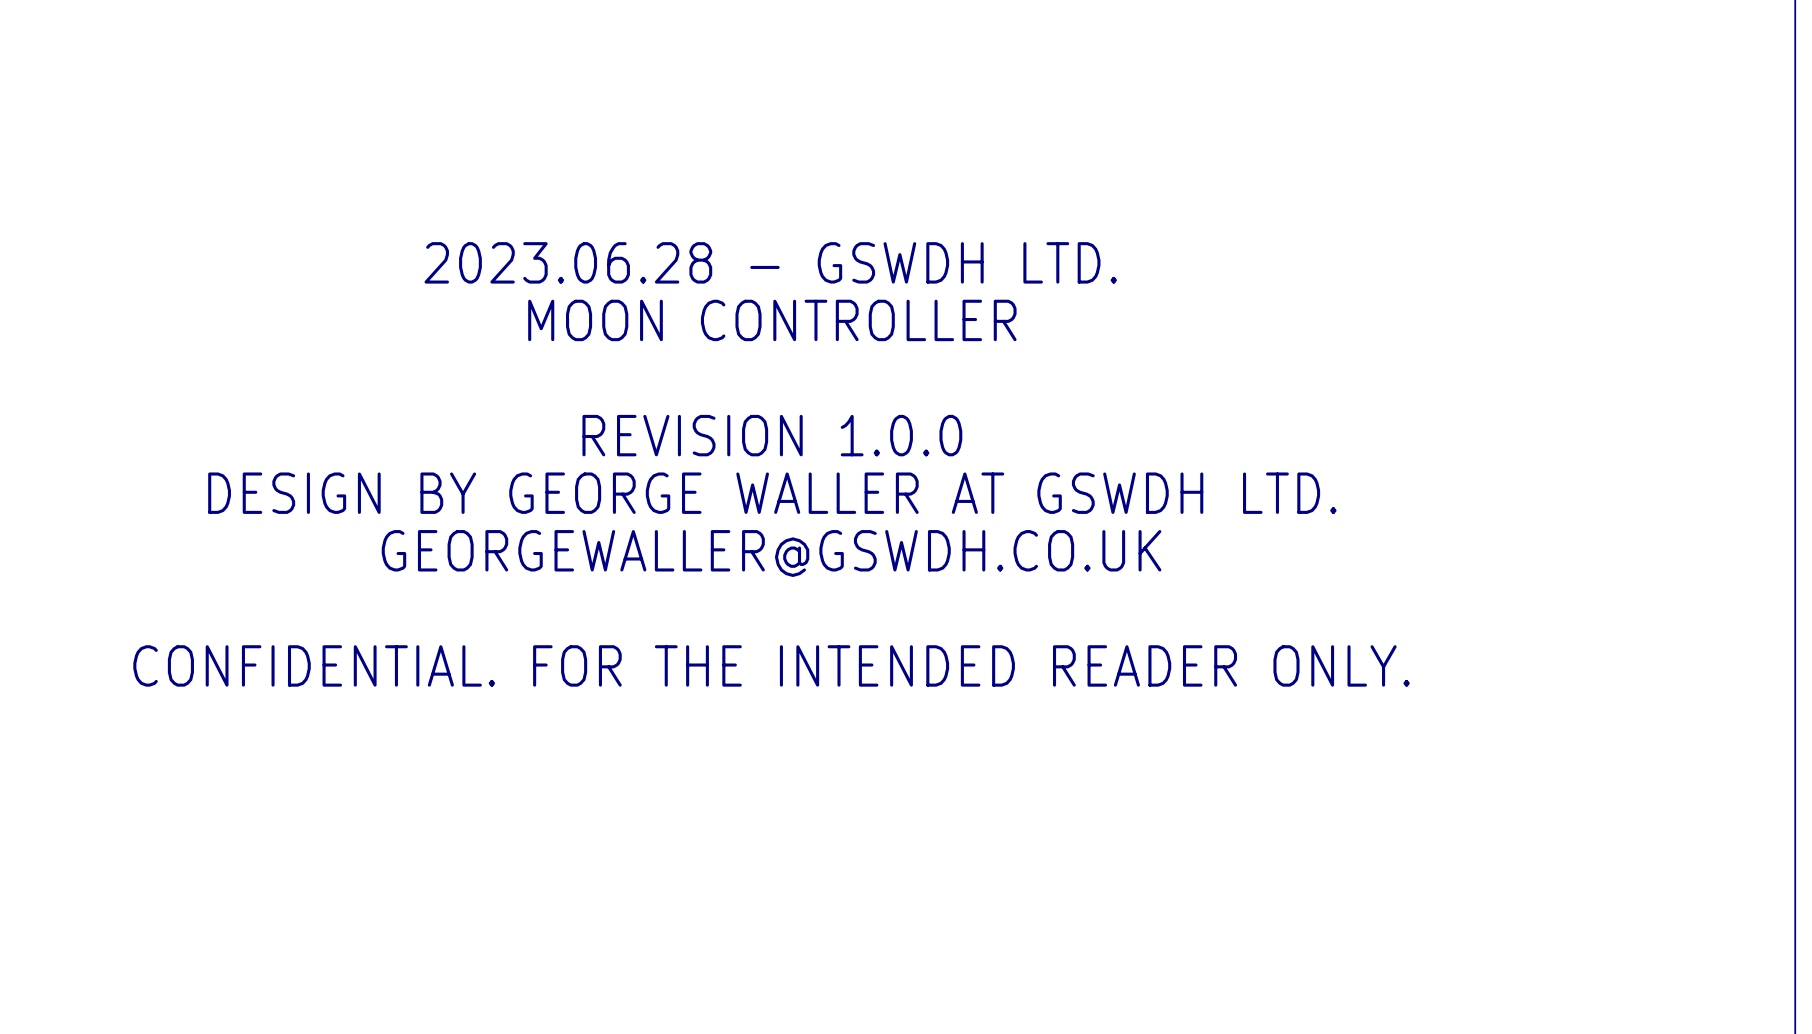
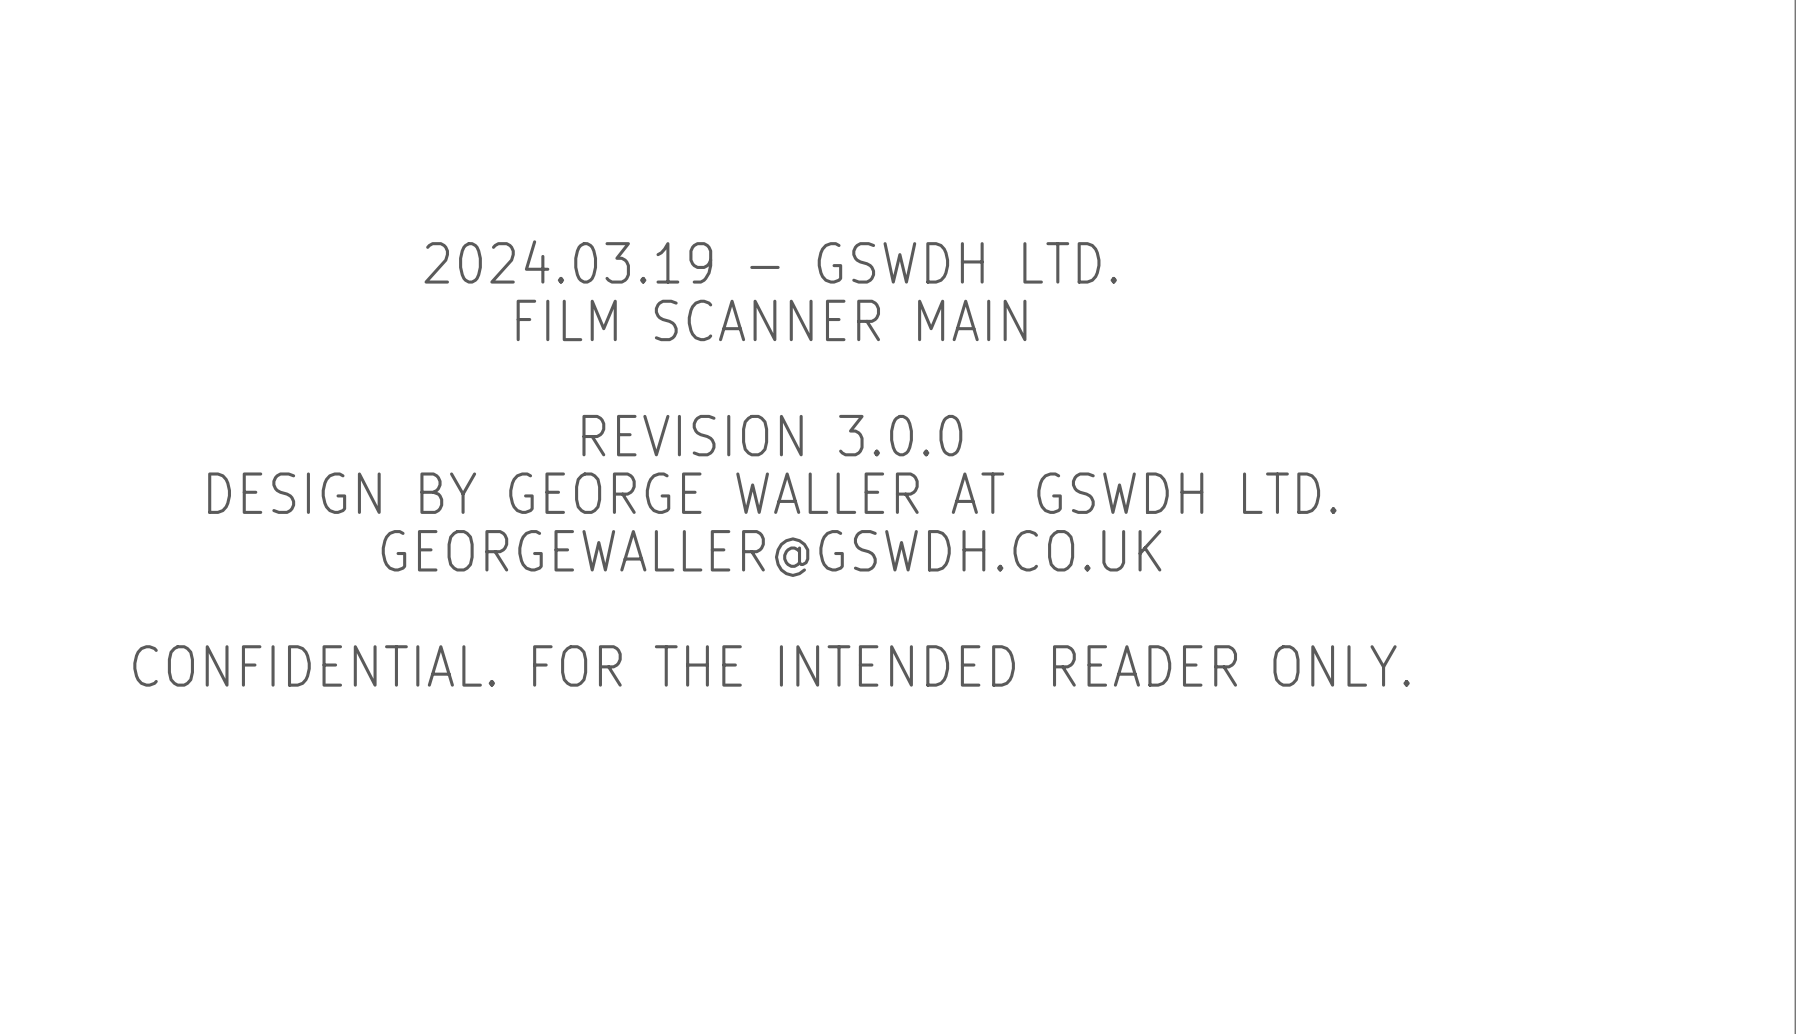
text: 2023.06.28 - GSWDH LTD. (770, 262) -> 2024.03.19 - GSWDH LTD. (770, 261)
text: MOON CONTROLLER (772, 320) -> FILM SCANNER MAIN (771, 320)
text: REVISION 1.0.0 (772, 435) -> REVISION 3.0.0 (772, 435)

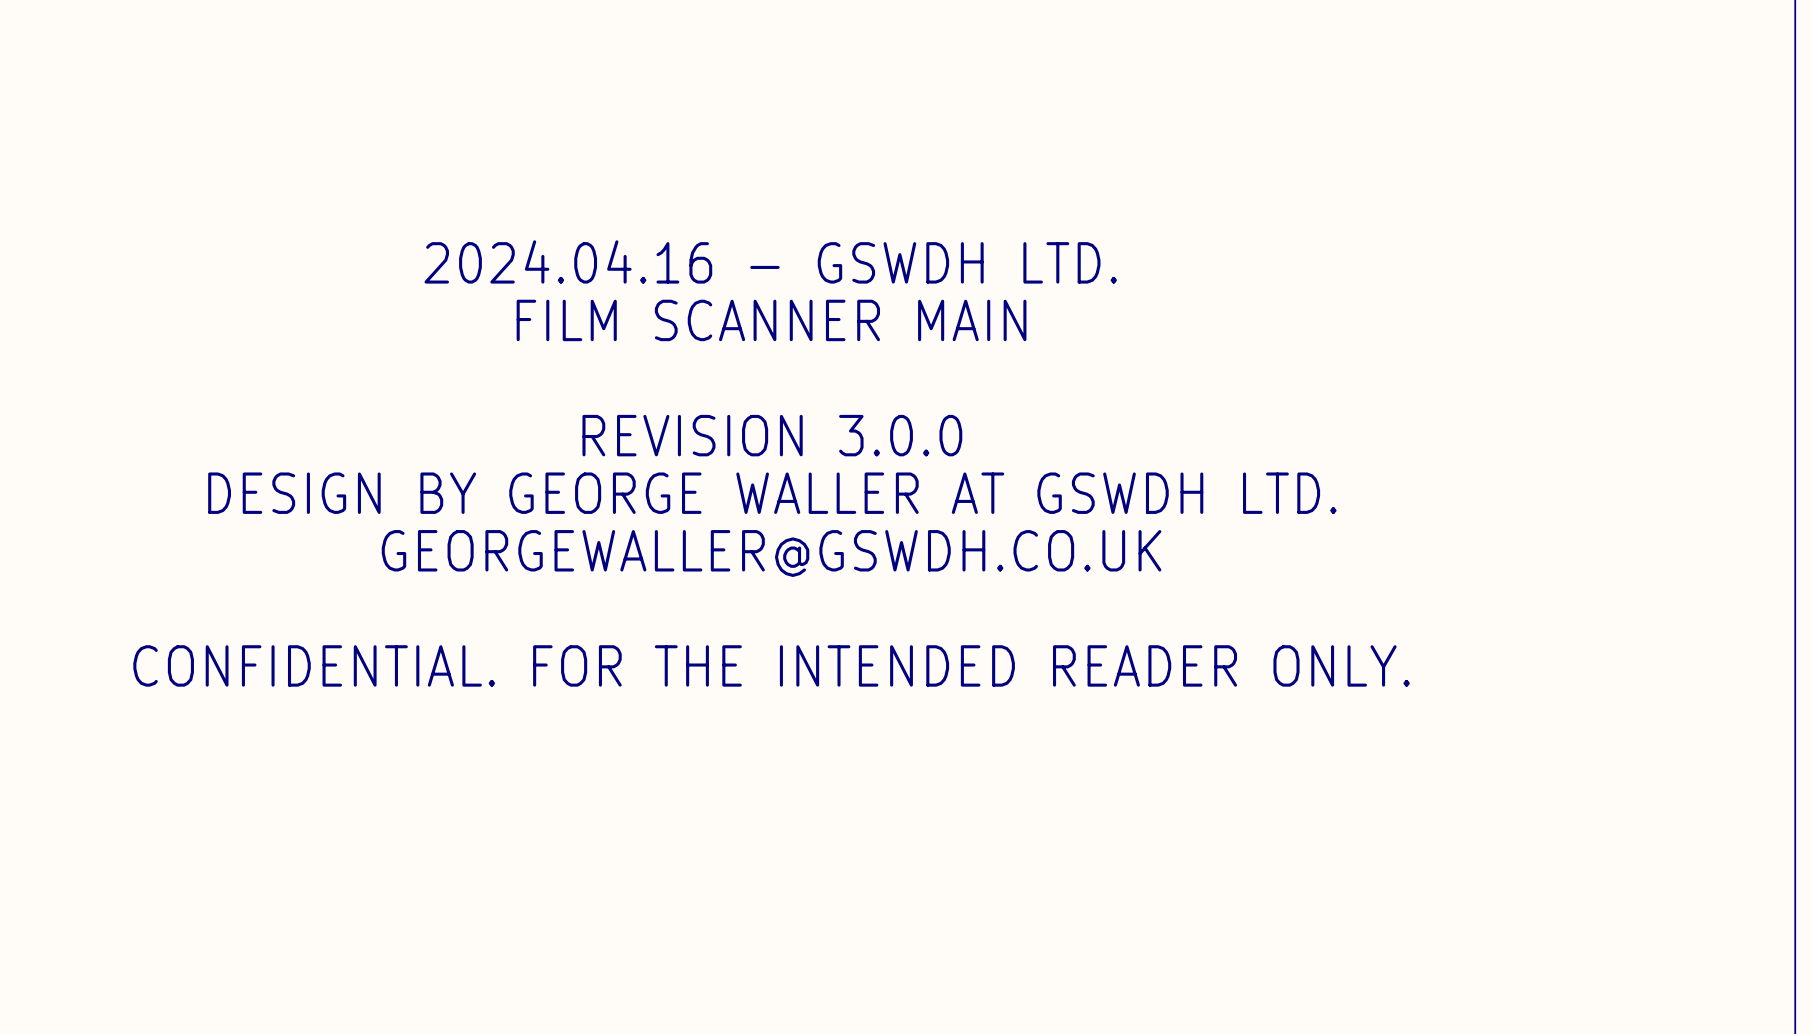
text: 2024.03.19 - GSWDH LTD. (770, 261) -> 2024.04.16 - GSWDH LTD. (770, 261)

